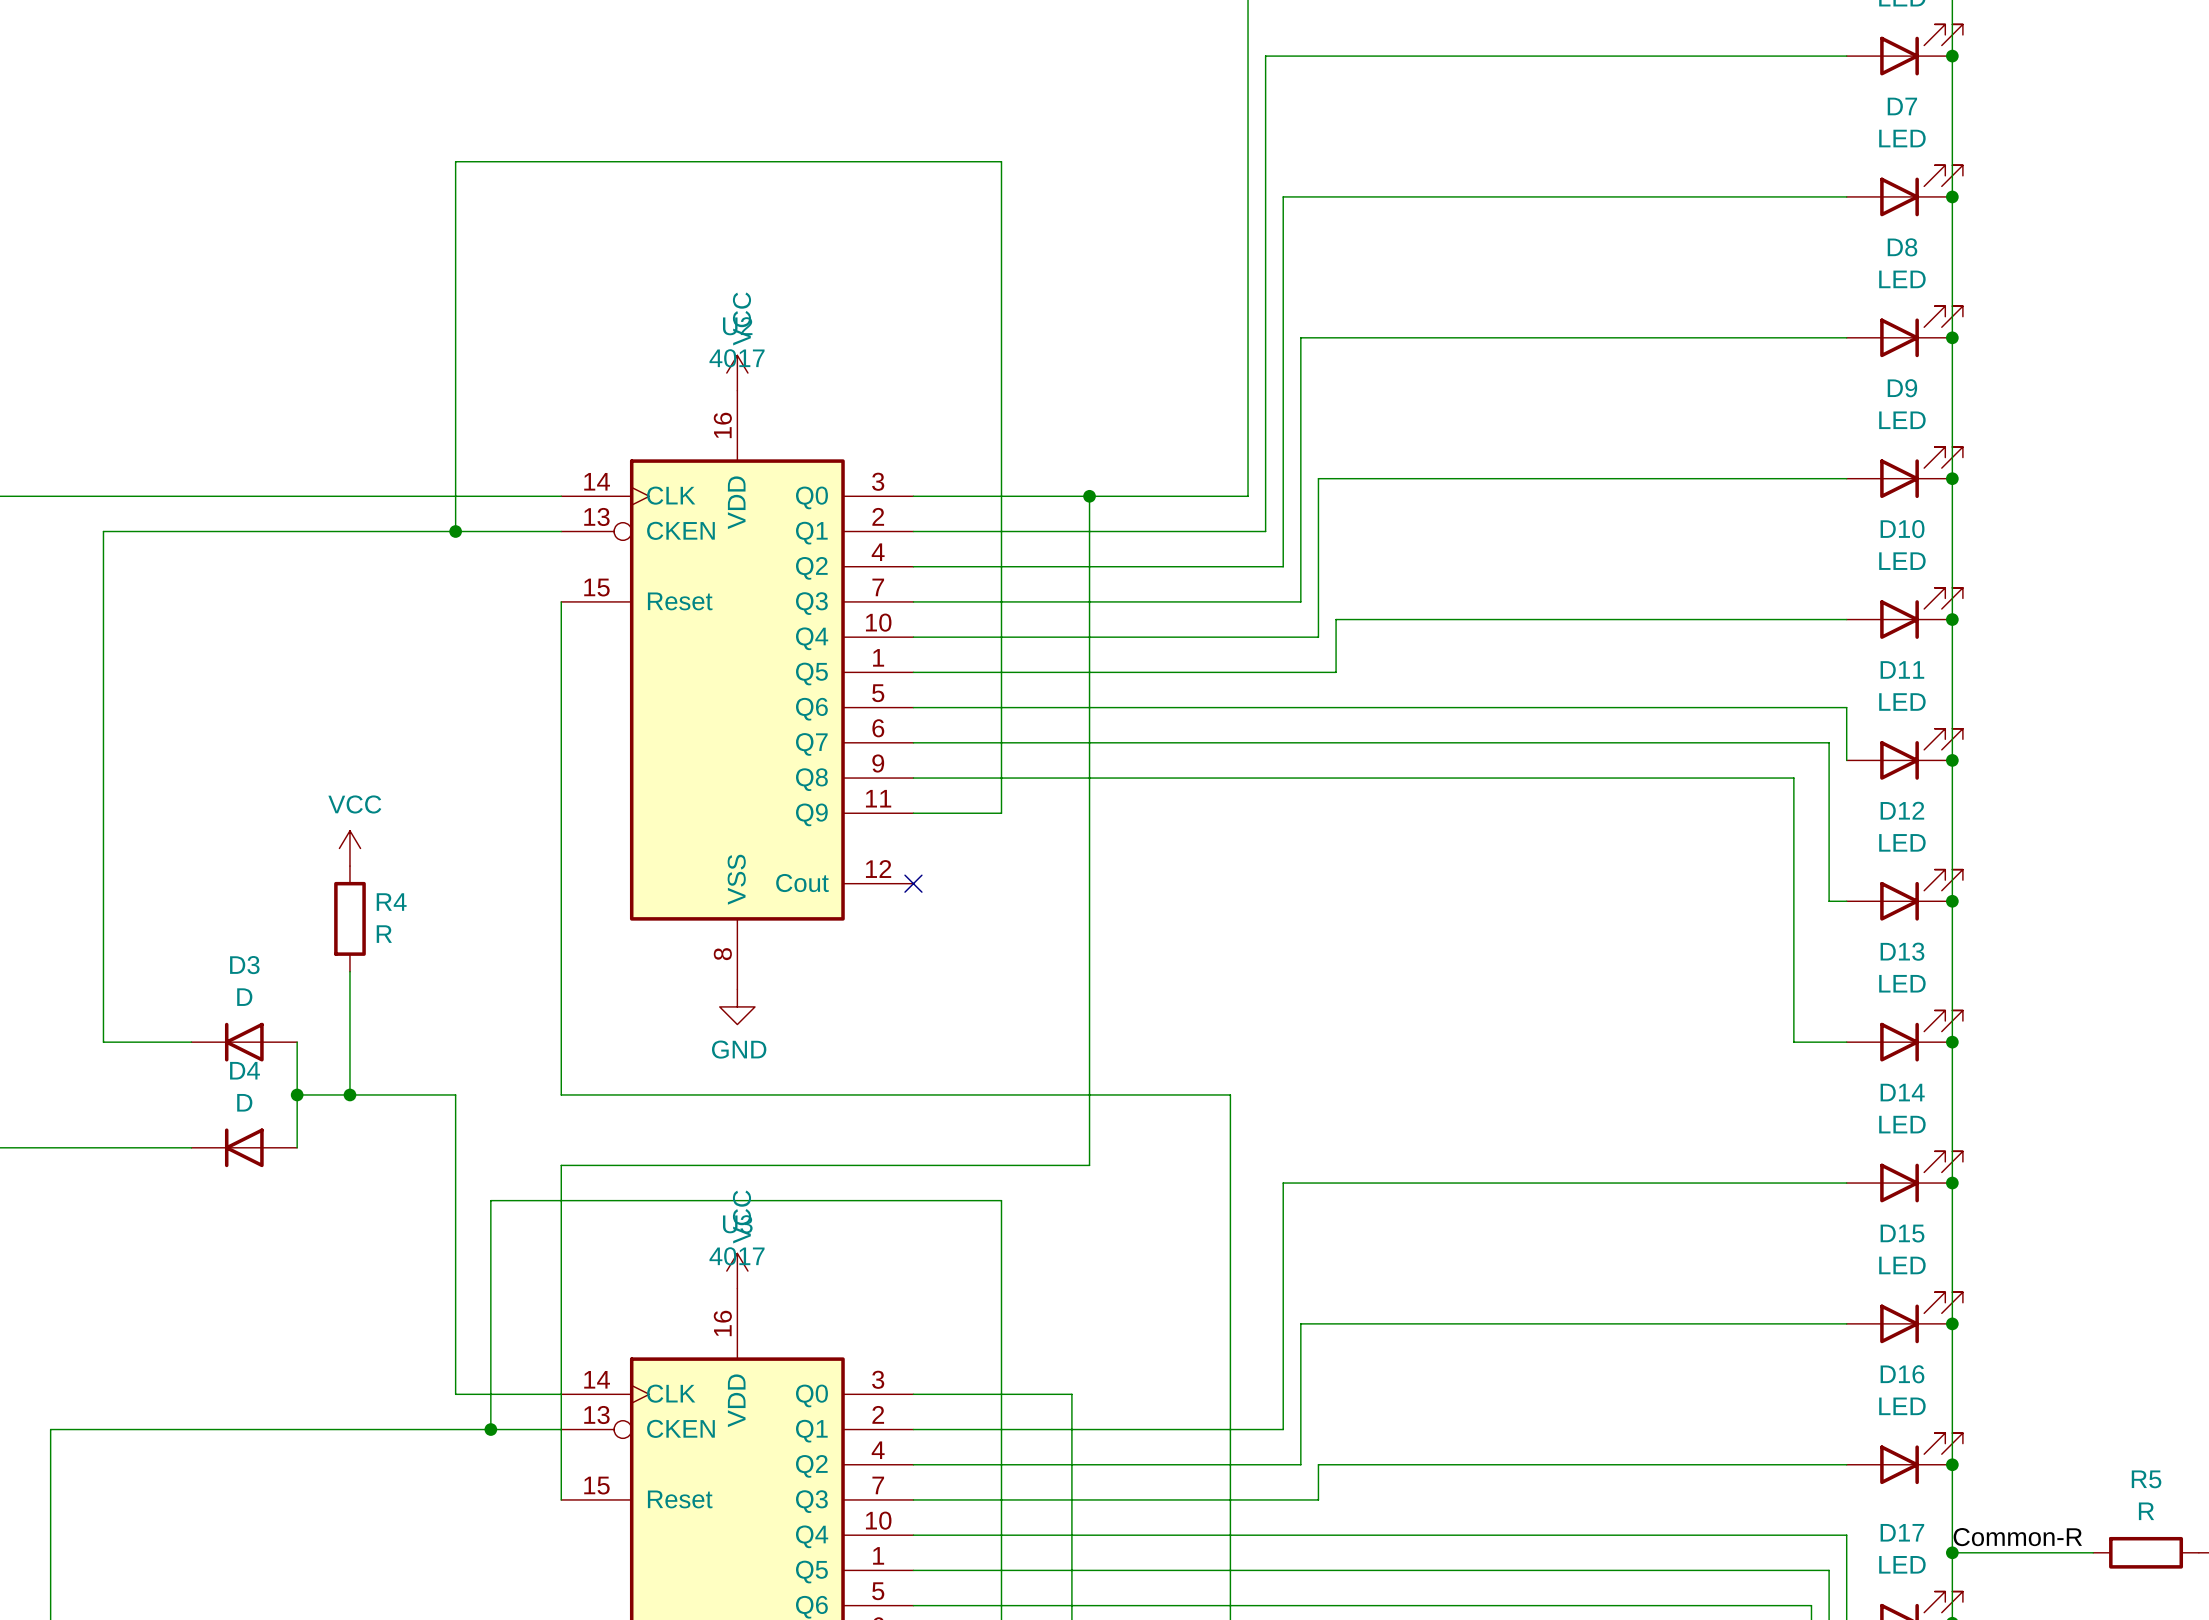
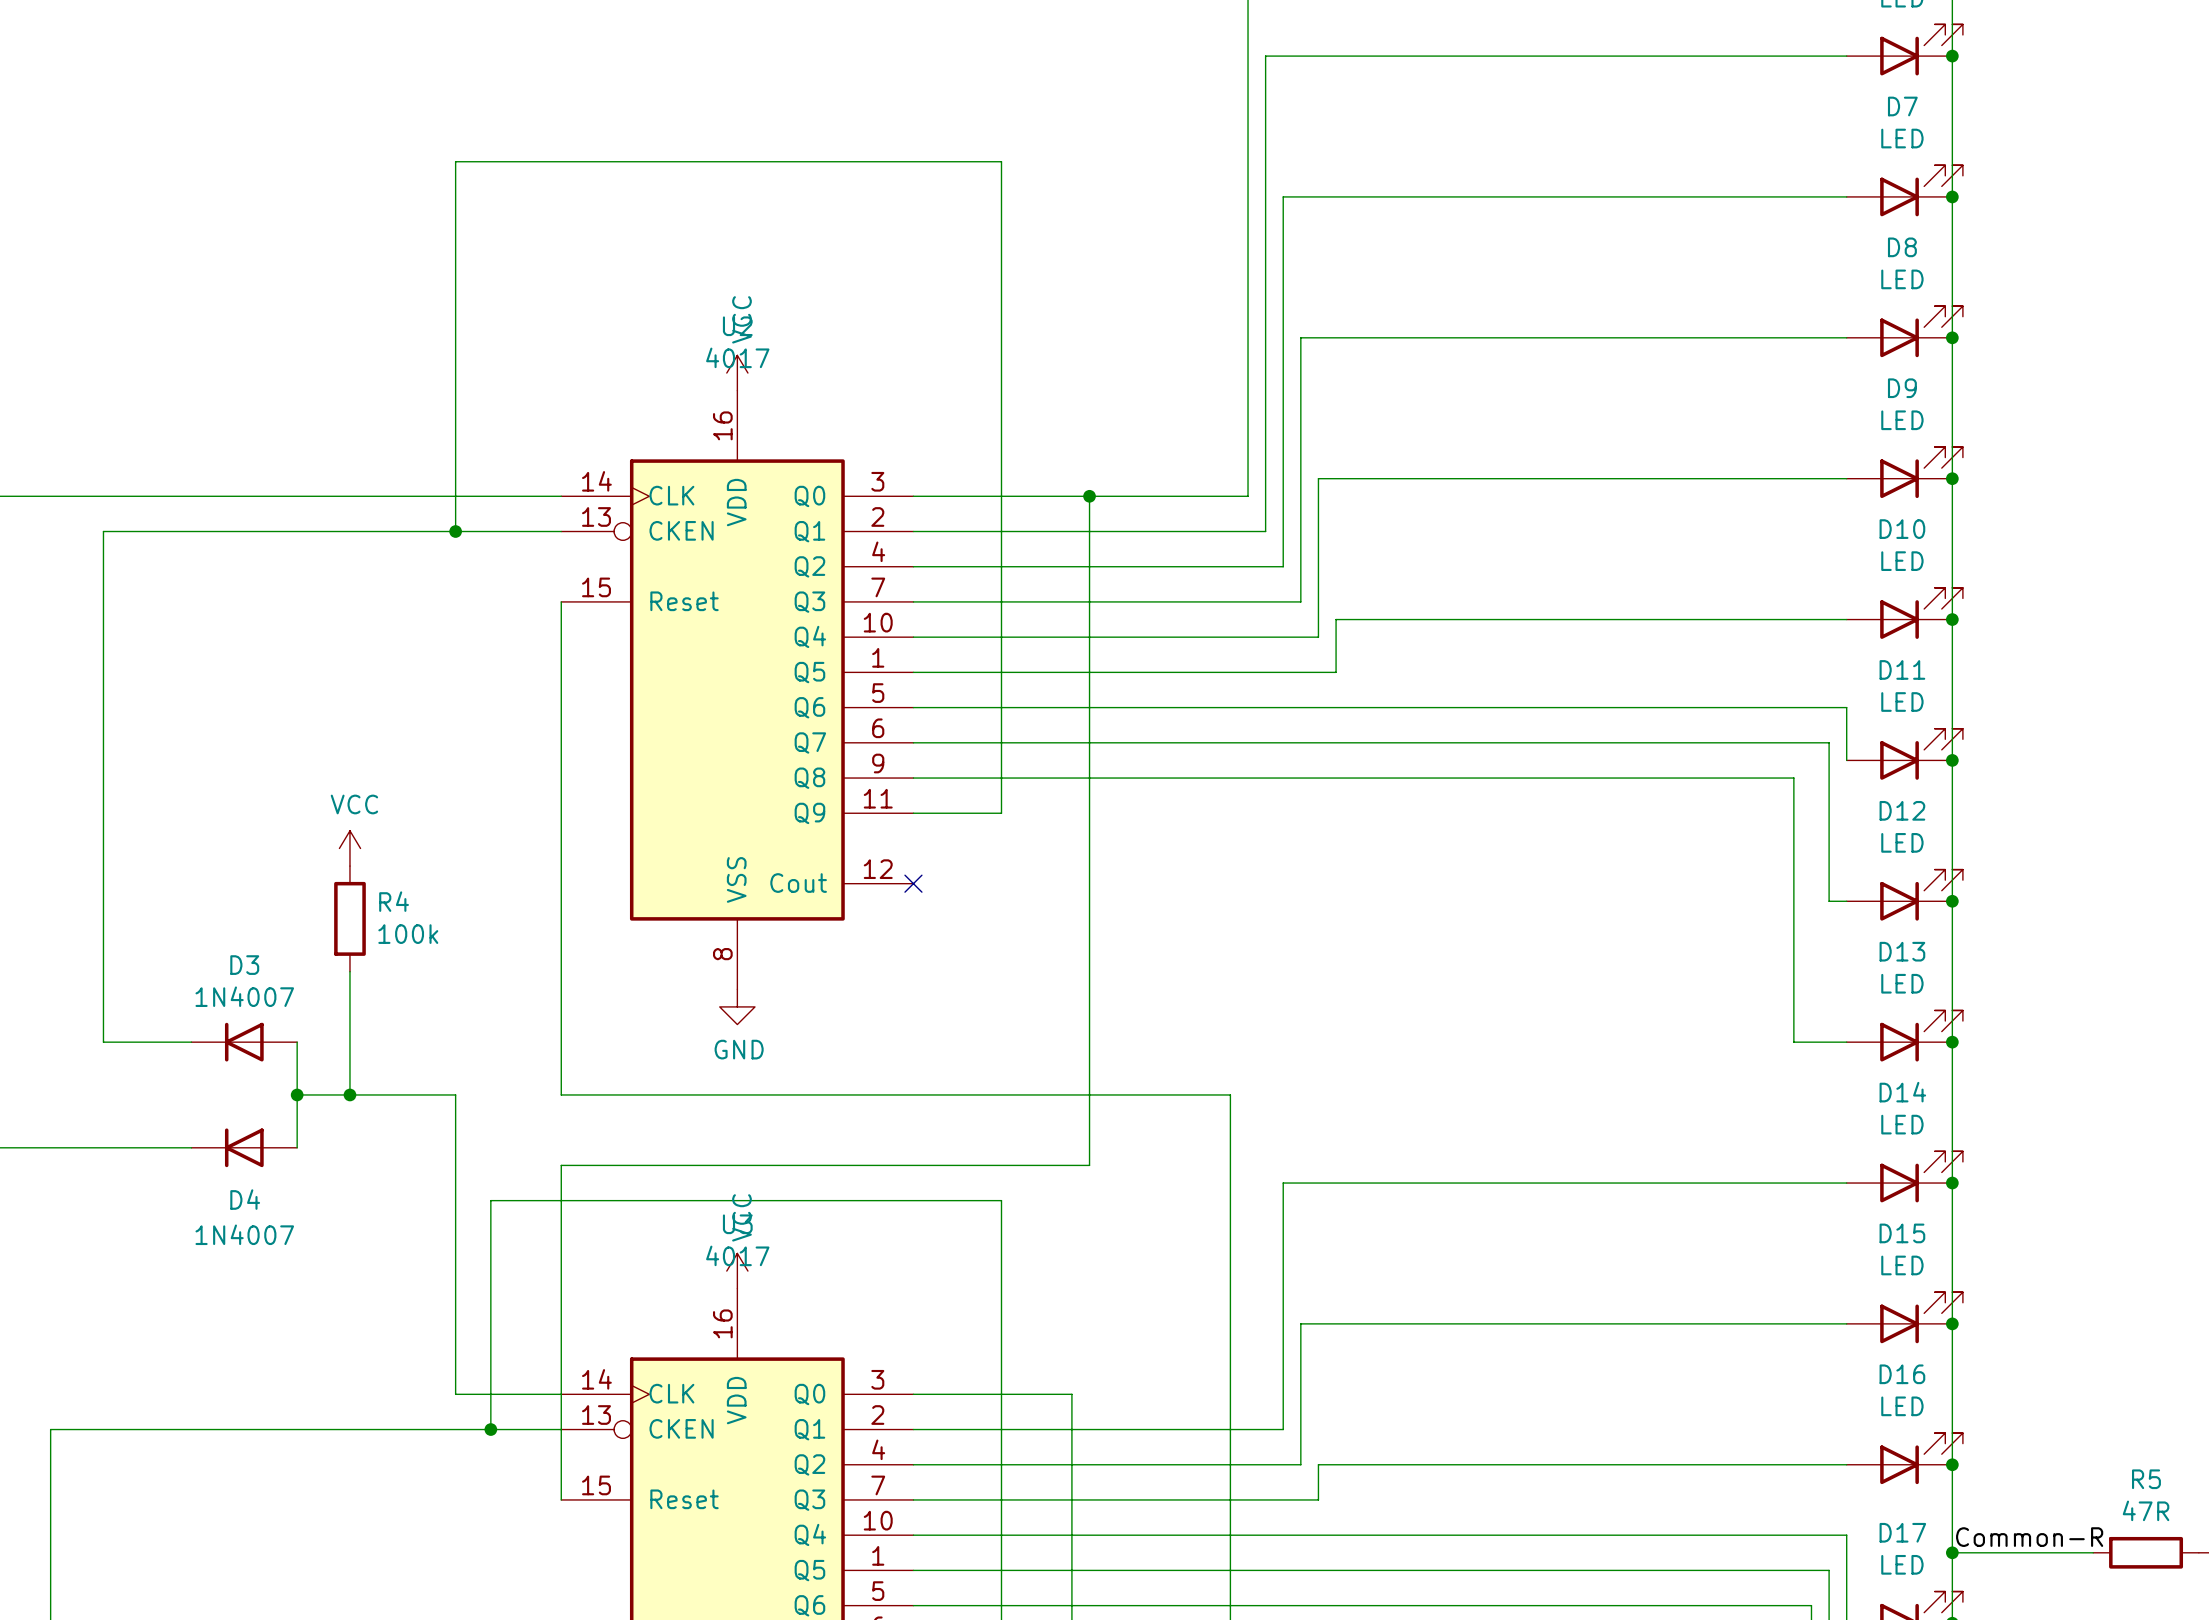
R4 value: R (384, 934) -> 100k (408, 934)
D3 value: D (244, 997) -> 1N4007 (244, 996)
D4 name position: D4 (245, 1070) -> D4 (245, 1199)
D4 value: D (244, 1102) -> 1N4007 (244, 1234)
R5 value: R (2146, 1511) -> 47R (2146, 1510)

